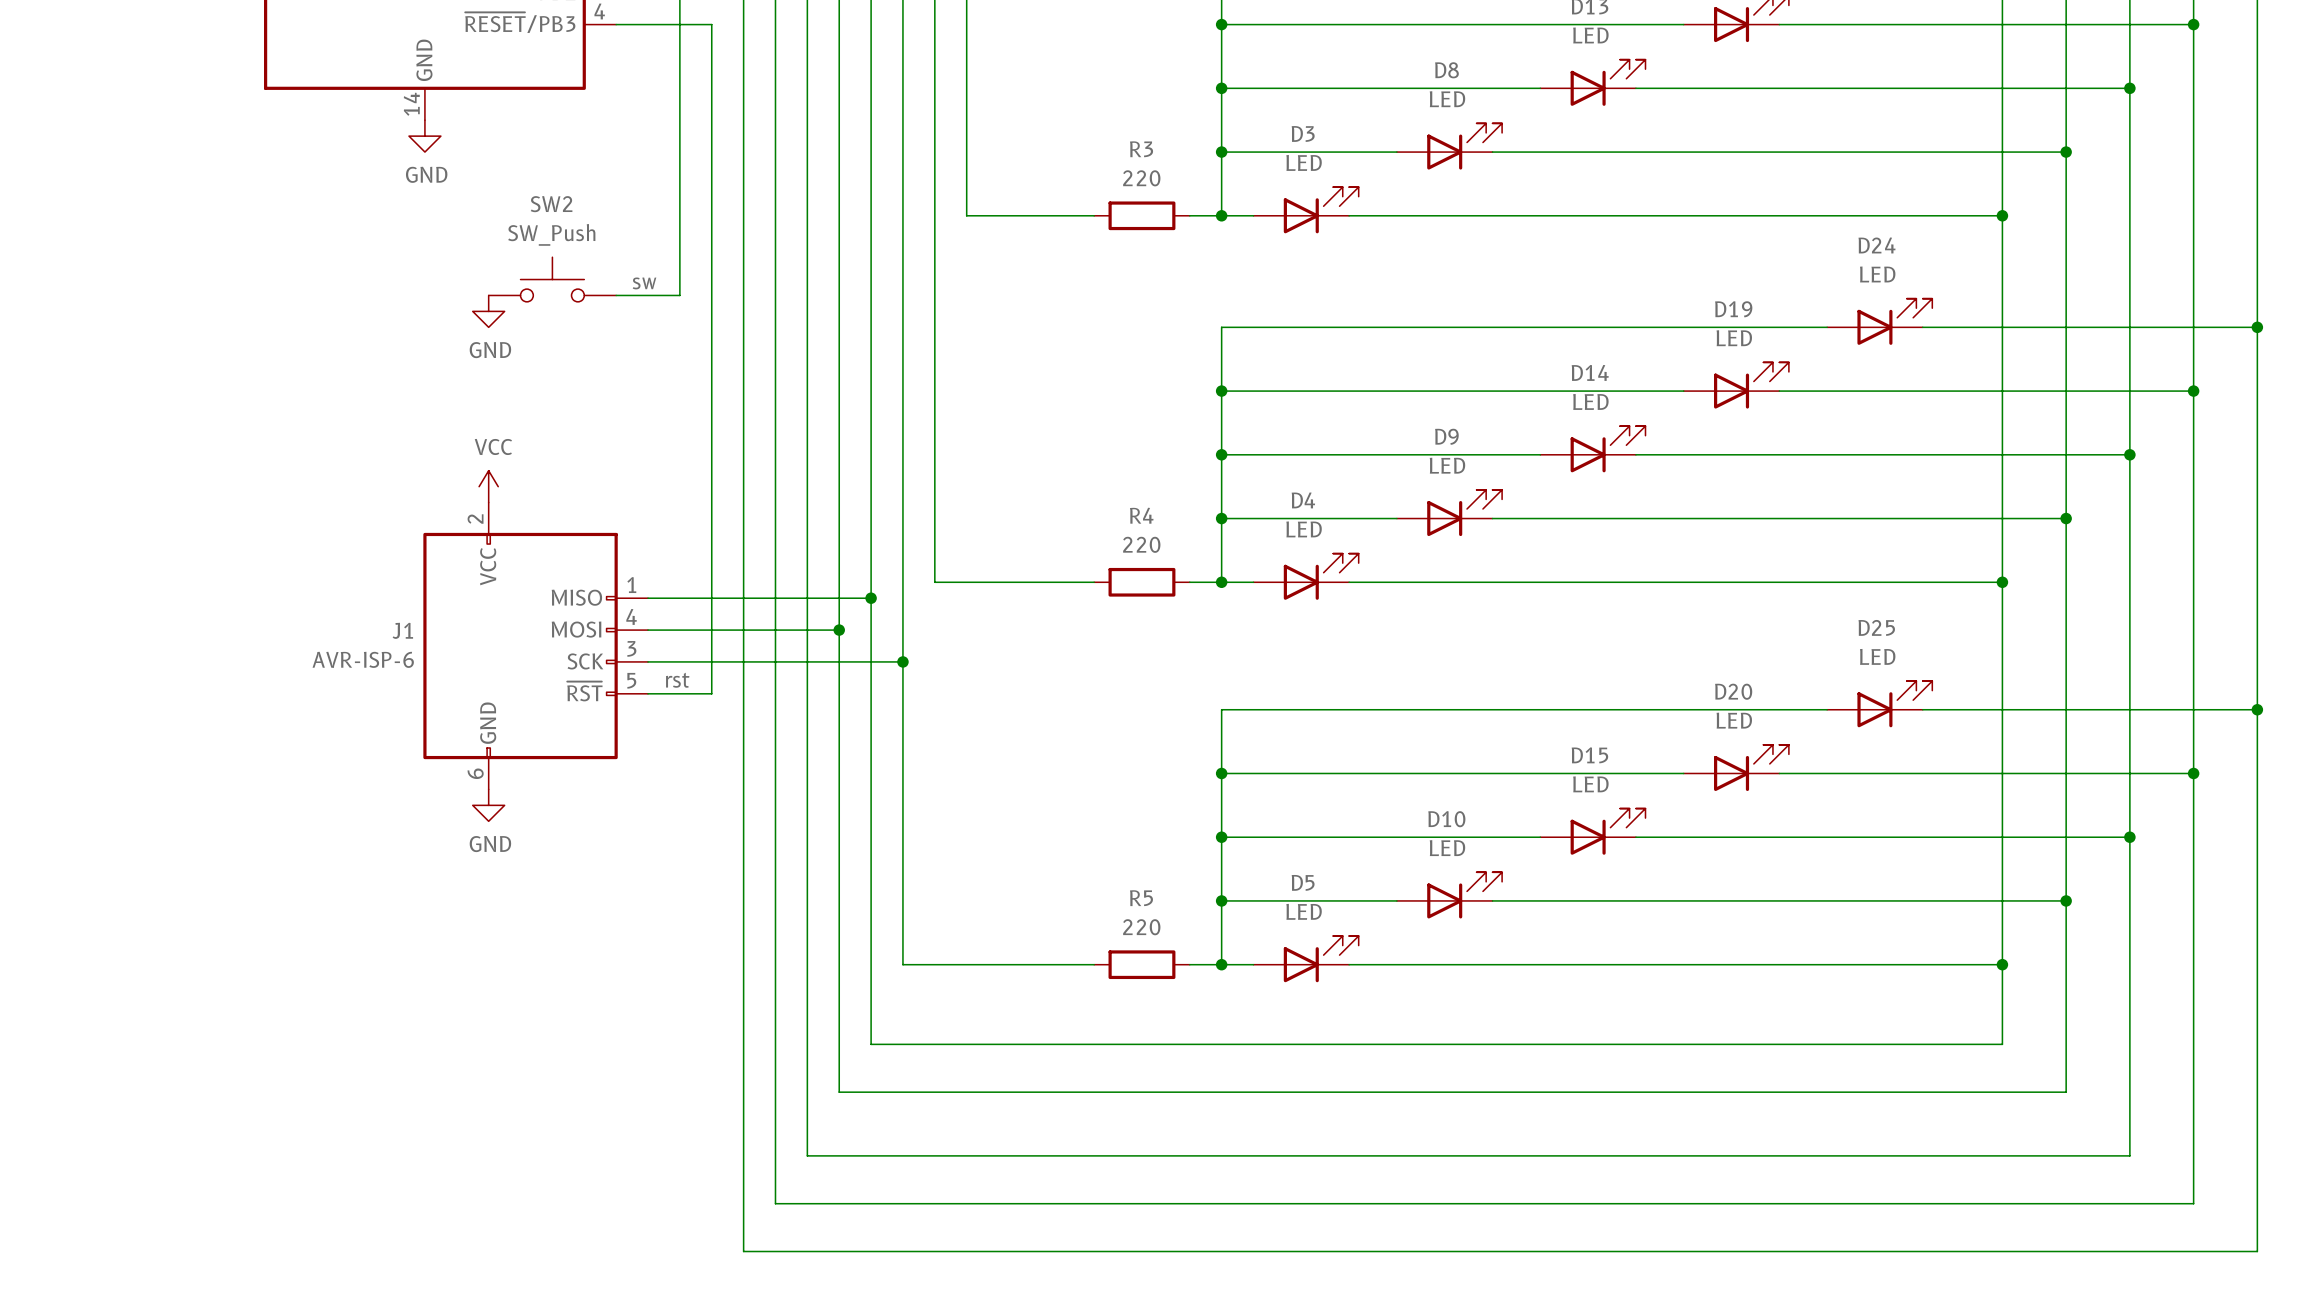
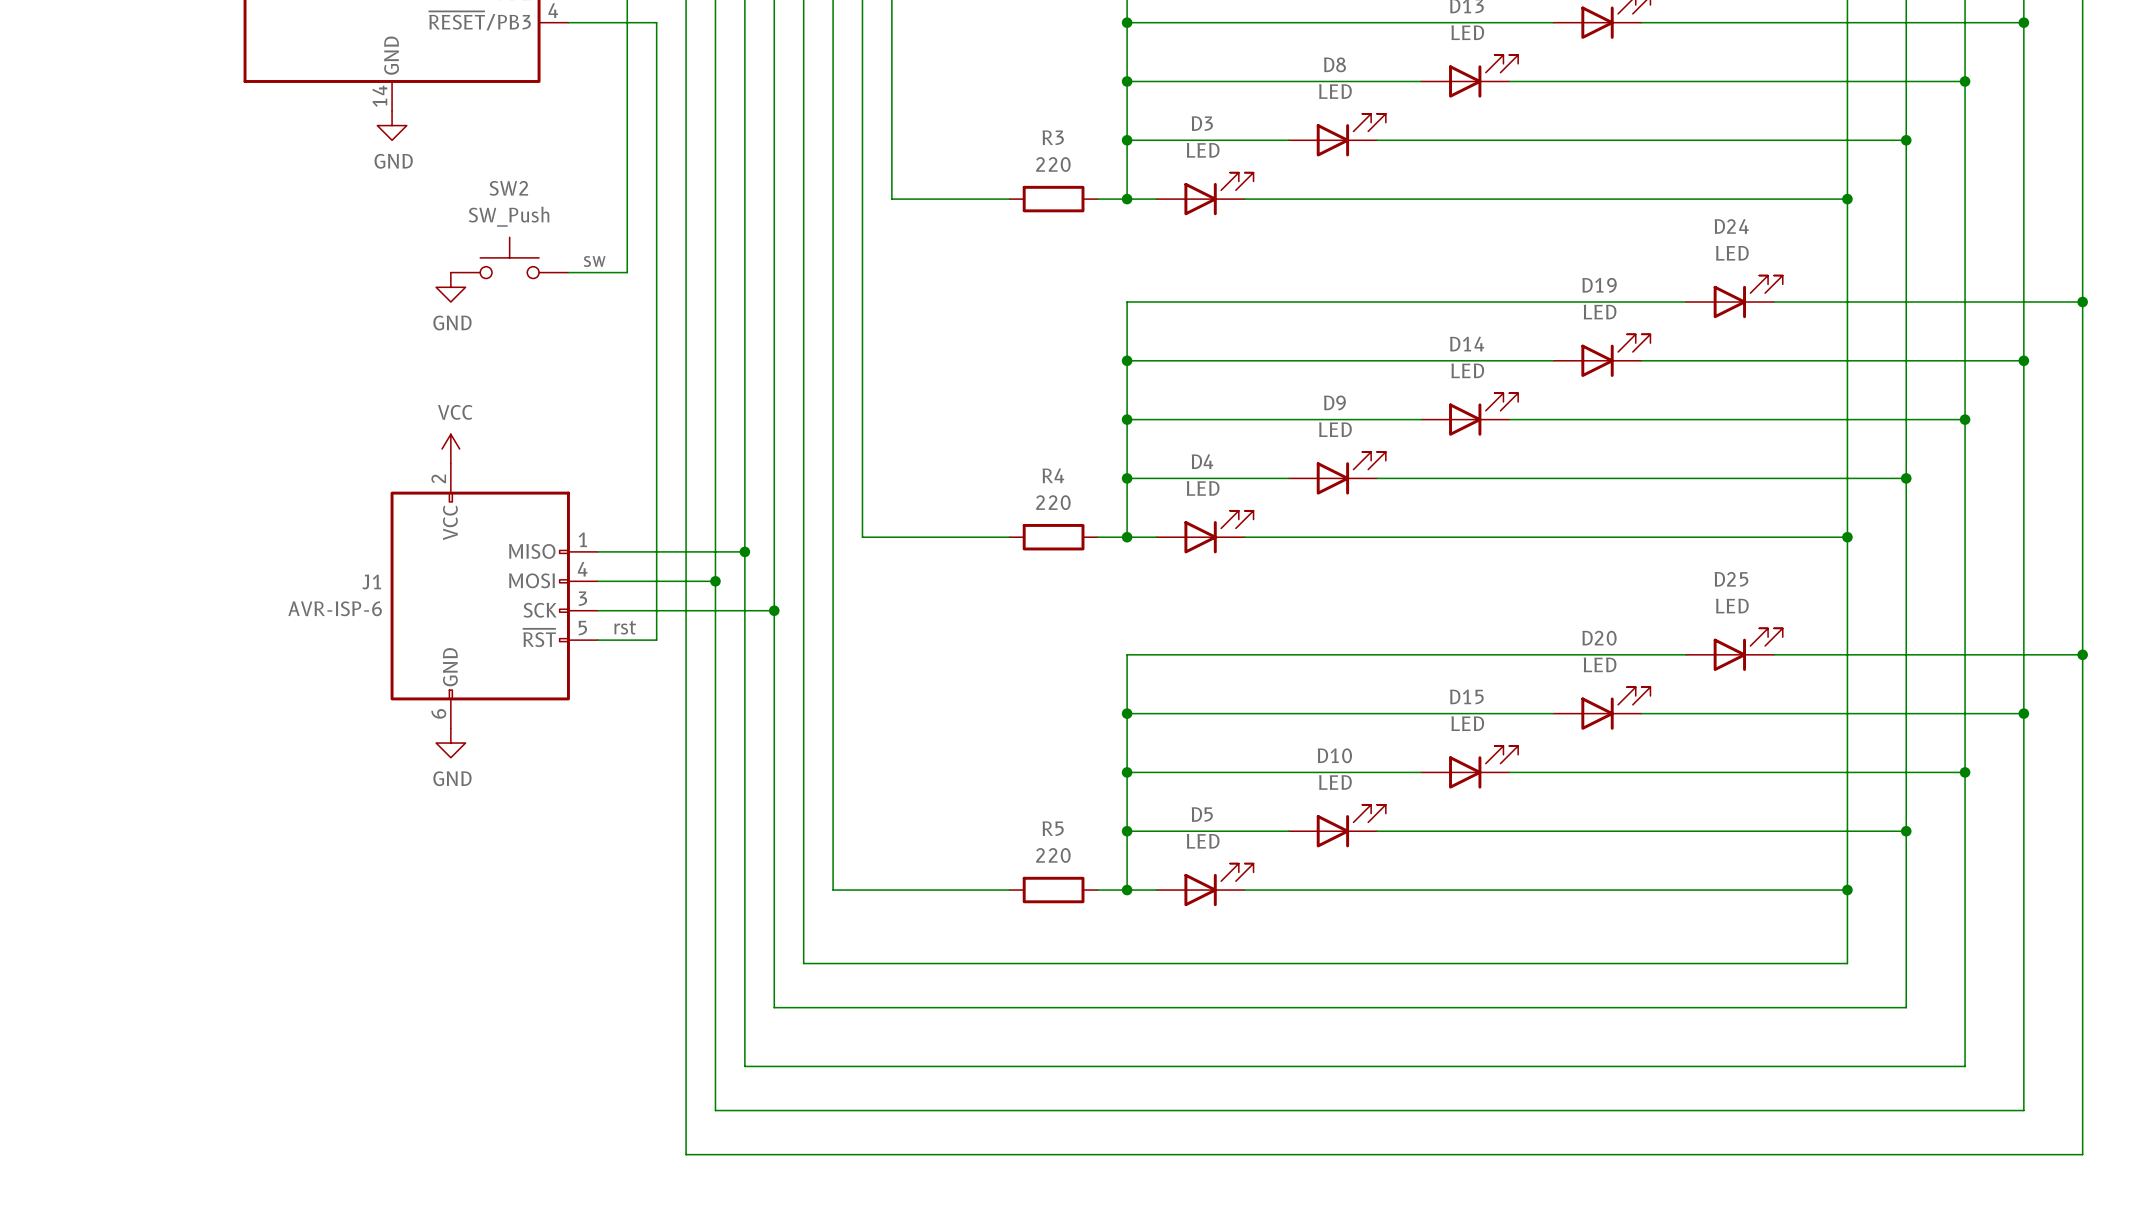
wire: (807, 598) (871, 598) -> none
junction: none -> (744, 551)
junction: (871, 598) -> none
wire: (775, 630) (839, 630) -> none
junction: none -> (715, 581)
junction: (839, 630) -> none
wire: (839, 661) (902, 661) -> none
junction: none -> (774, 610)
junction: (902, 661) -> none

